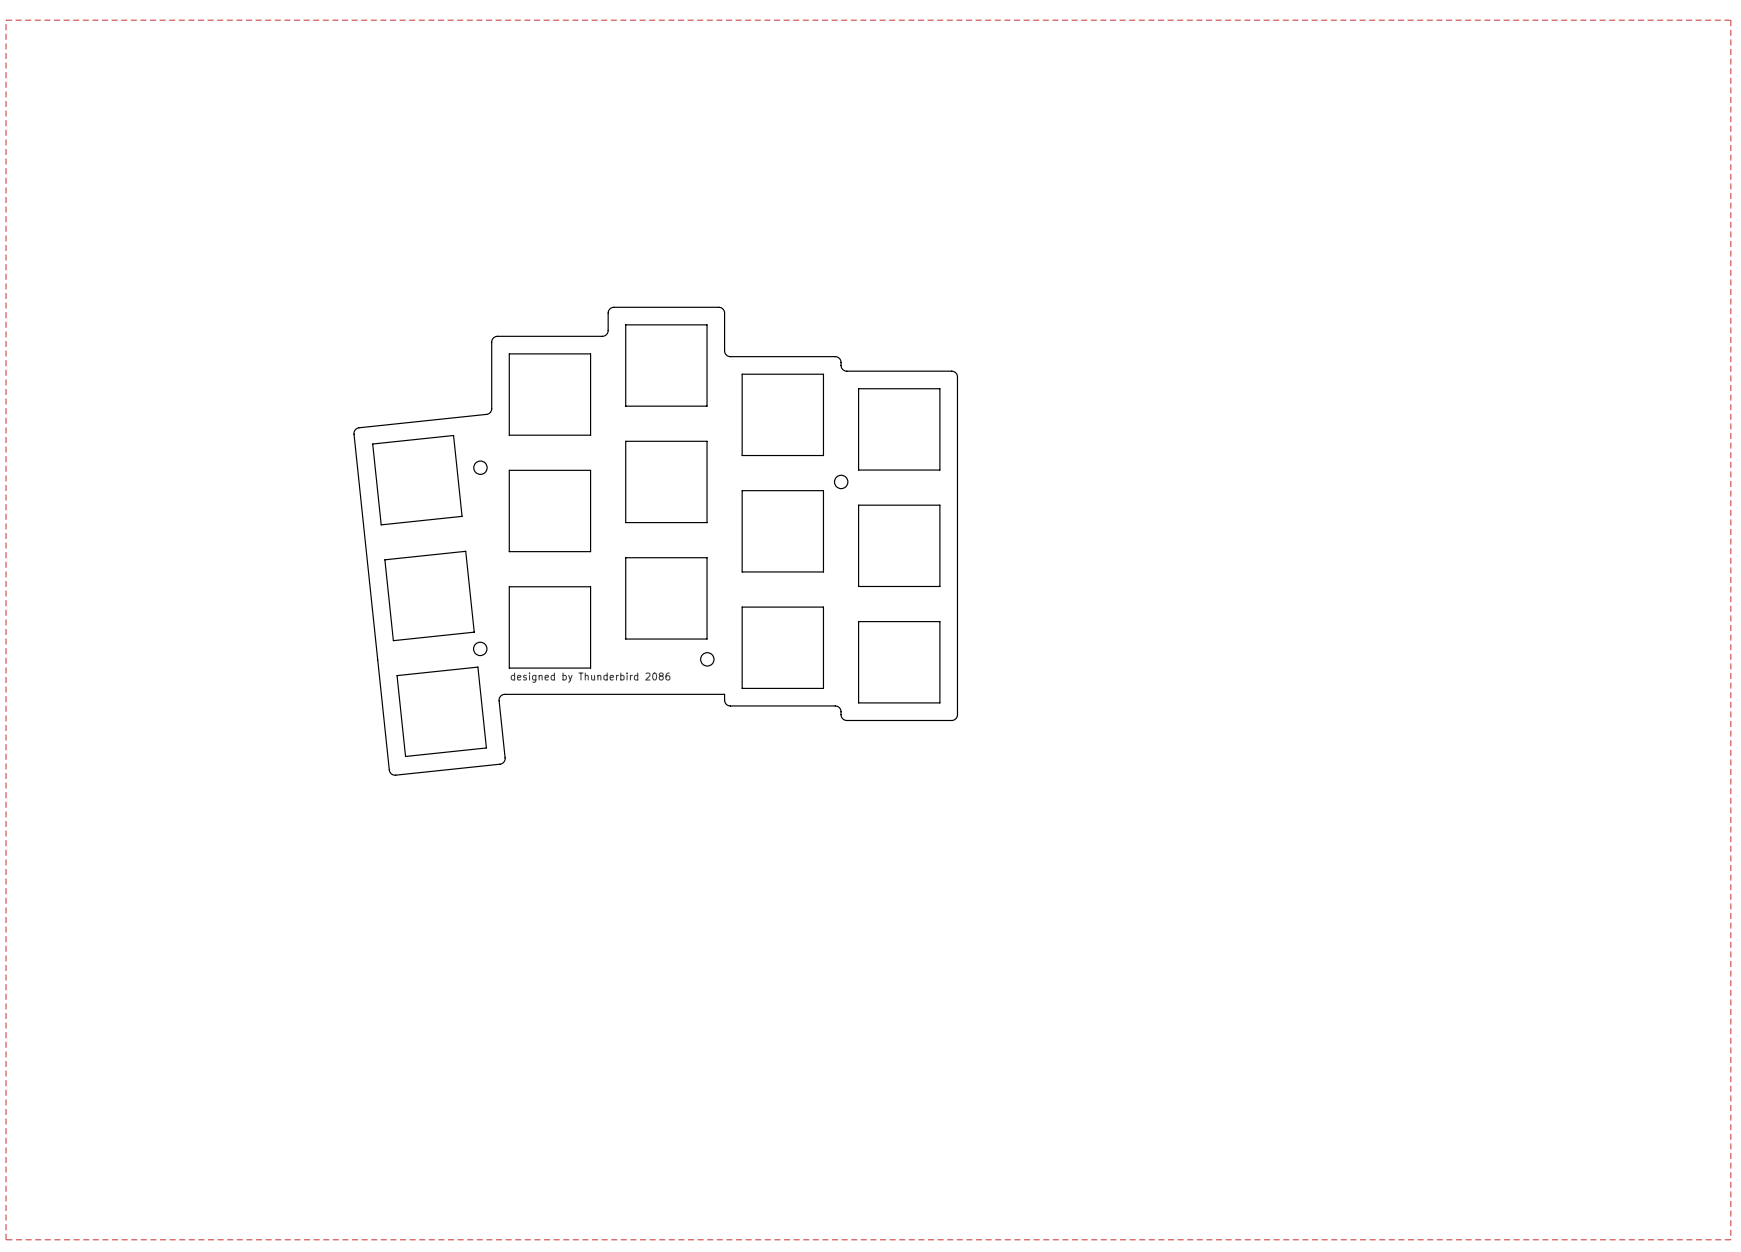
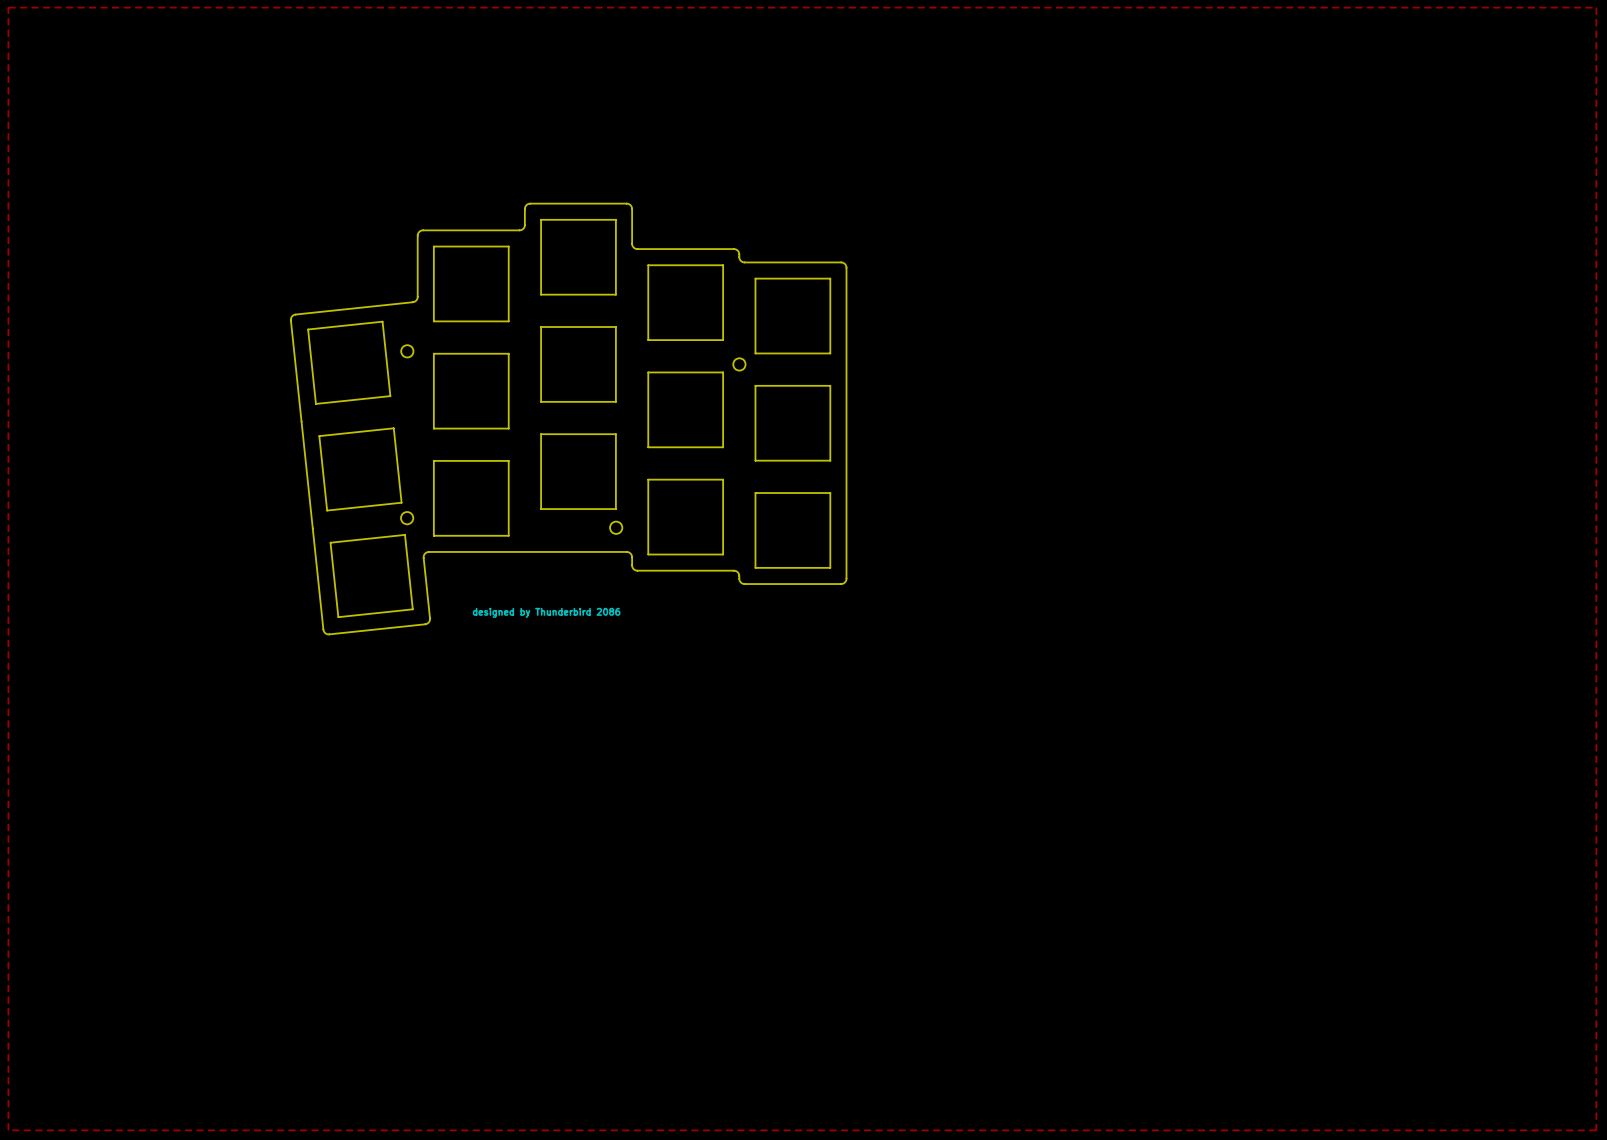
board edge: (613, 307) (721, 307) (724, 312) (724, 351) (729, 356) (835, 356) (840, 359) (841, 368) (846, 371) (951, 371) (956, 373) (957, 714) (955, 719) (846, 720) (841, 717) (840, 709) (836, 706) (729, 705) (725, 702) (724, 694) (504, 694) (499, 700) (505, 757) (502, 763) (395, 775) (390, 772) (354, 431) (359, 427) (488, 413) (491, 409) (491, 342) (493, 337) (603, 336) (608, 331) (608, 310) (613, 307) -> (530, 203) (525, 206) (524, 226) (520, 230) (419, 231) (417, 235) (417, 297) (414, 301) (295, 314) (291, 317) (324, 632) (329, 634) (428, 623) (430, 618) (423, 557) (428, 552) (627, 551) (631, 554) (632, 566) (636, 570) (734, 570) (738, 573) (740, 581) (744, 584) (844, 582) (846, 578) (845, 264) (841, 262) (743, 262) (740, 259) (738, 251) (734, 249) (636, 249) (632, 244) (632, 208) (629, 204) (530, 203)
board edge: (625, 324) (625, 406) (707, 406) (707, 324) (625, 324) -> (541, 219) (541, 294) (615, 294) (615, 219) (541, 219)
board edge: (509, 353) (509, 435) (590, 435) (590, 353) (509, 353) -> (433, 246) (433, 321) (508, 321) (508, 246) (433, 246)
board edge: (742, 374) (823, 374) (823, 455) (742, 455) (742, 374) -> (648, 265) (723, 265) (723, 340) (648, 340) (648, 265)
round board edge: none -> [400, 344, 414, 358]
board edge: (858, 388) (858, 470) (939, 470) (939, 388) (858, 388) -> (755, 278) (755, 353) (830, 353) (830, 278) (755, 278)
board edge: (453, 435) (462, 516) (381, 524) (372, 444) (453, 435) -> (382, 321) (390, 396) (315, 403) (308, 329) (382, 321)
board edge: (625, 441) (707, 441) (707, 522) (625, 522) (625, 441) -> (541, 327) (615, 327) (615, 401) (541, 401) (541, 327)
round board edge: [473, 460, 488, 475] -> none
board edge: (509, 470) (590, 470) (590, 551) (509, 551) (509, 470) -> (433, 353) (508, 353) (508, 428) (433, 428) (433, 353)
round board edge position: (841, 481) -> (739, 364)
board edge: (742, 490) (742, 571) (823, 571) (823, 490) (742, 490) -> (648, 372) (648, 447) (723, 447) (723, 372) (648, 372)
board edge: (858, 505) (858, 586) (939, 586) (939, 505) (858, 505) -> (755, 385) (755, 460) (830, 460) (830, 385) (755, 385)
board edge: (465, 551) (474, 632) (393, 640) (384, 559) (465, 551) -> (393, 428) (401, 502) (327, 510) (319, 436) (393, 428)
board edge: (625, 557) (625, 639) (707, 639) (707, 557) (625, 557) -> (541, 434) (541, 509) (615, 509) (615, 434) (541, 434)
round board edge: none -> [400, 511, 414, 525]
board edge: (509, 586) (590, 586) (590, 668) (509, 668) (509, 586) -> (433, 460) (508, 460) (508, 535) (433, 535) (433, 460)
board edge: (742, 607) (823, 607) (823, 688) (742, 688) (742, 607) -> (648, 479) (723, 479) (723, 554) (648, 554) (648, 479)
board edge: (858, 621) (858, 702) (939, 702) (939, 621) (858, 621) -> (755, 493) (755, 567) (830, 567) (830, 493) (755, 493)
round board edge: [473, 641, 488, 657] -> none
round board edge position: (707, 659) -> (616, 527)
board edge: (477, 667) (486, 747) (405, 756) (397, 675) (477, 667) -> (404, 534) (412, 609) (338, 617) (330, 542) (404, 534)

